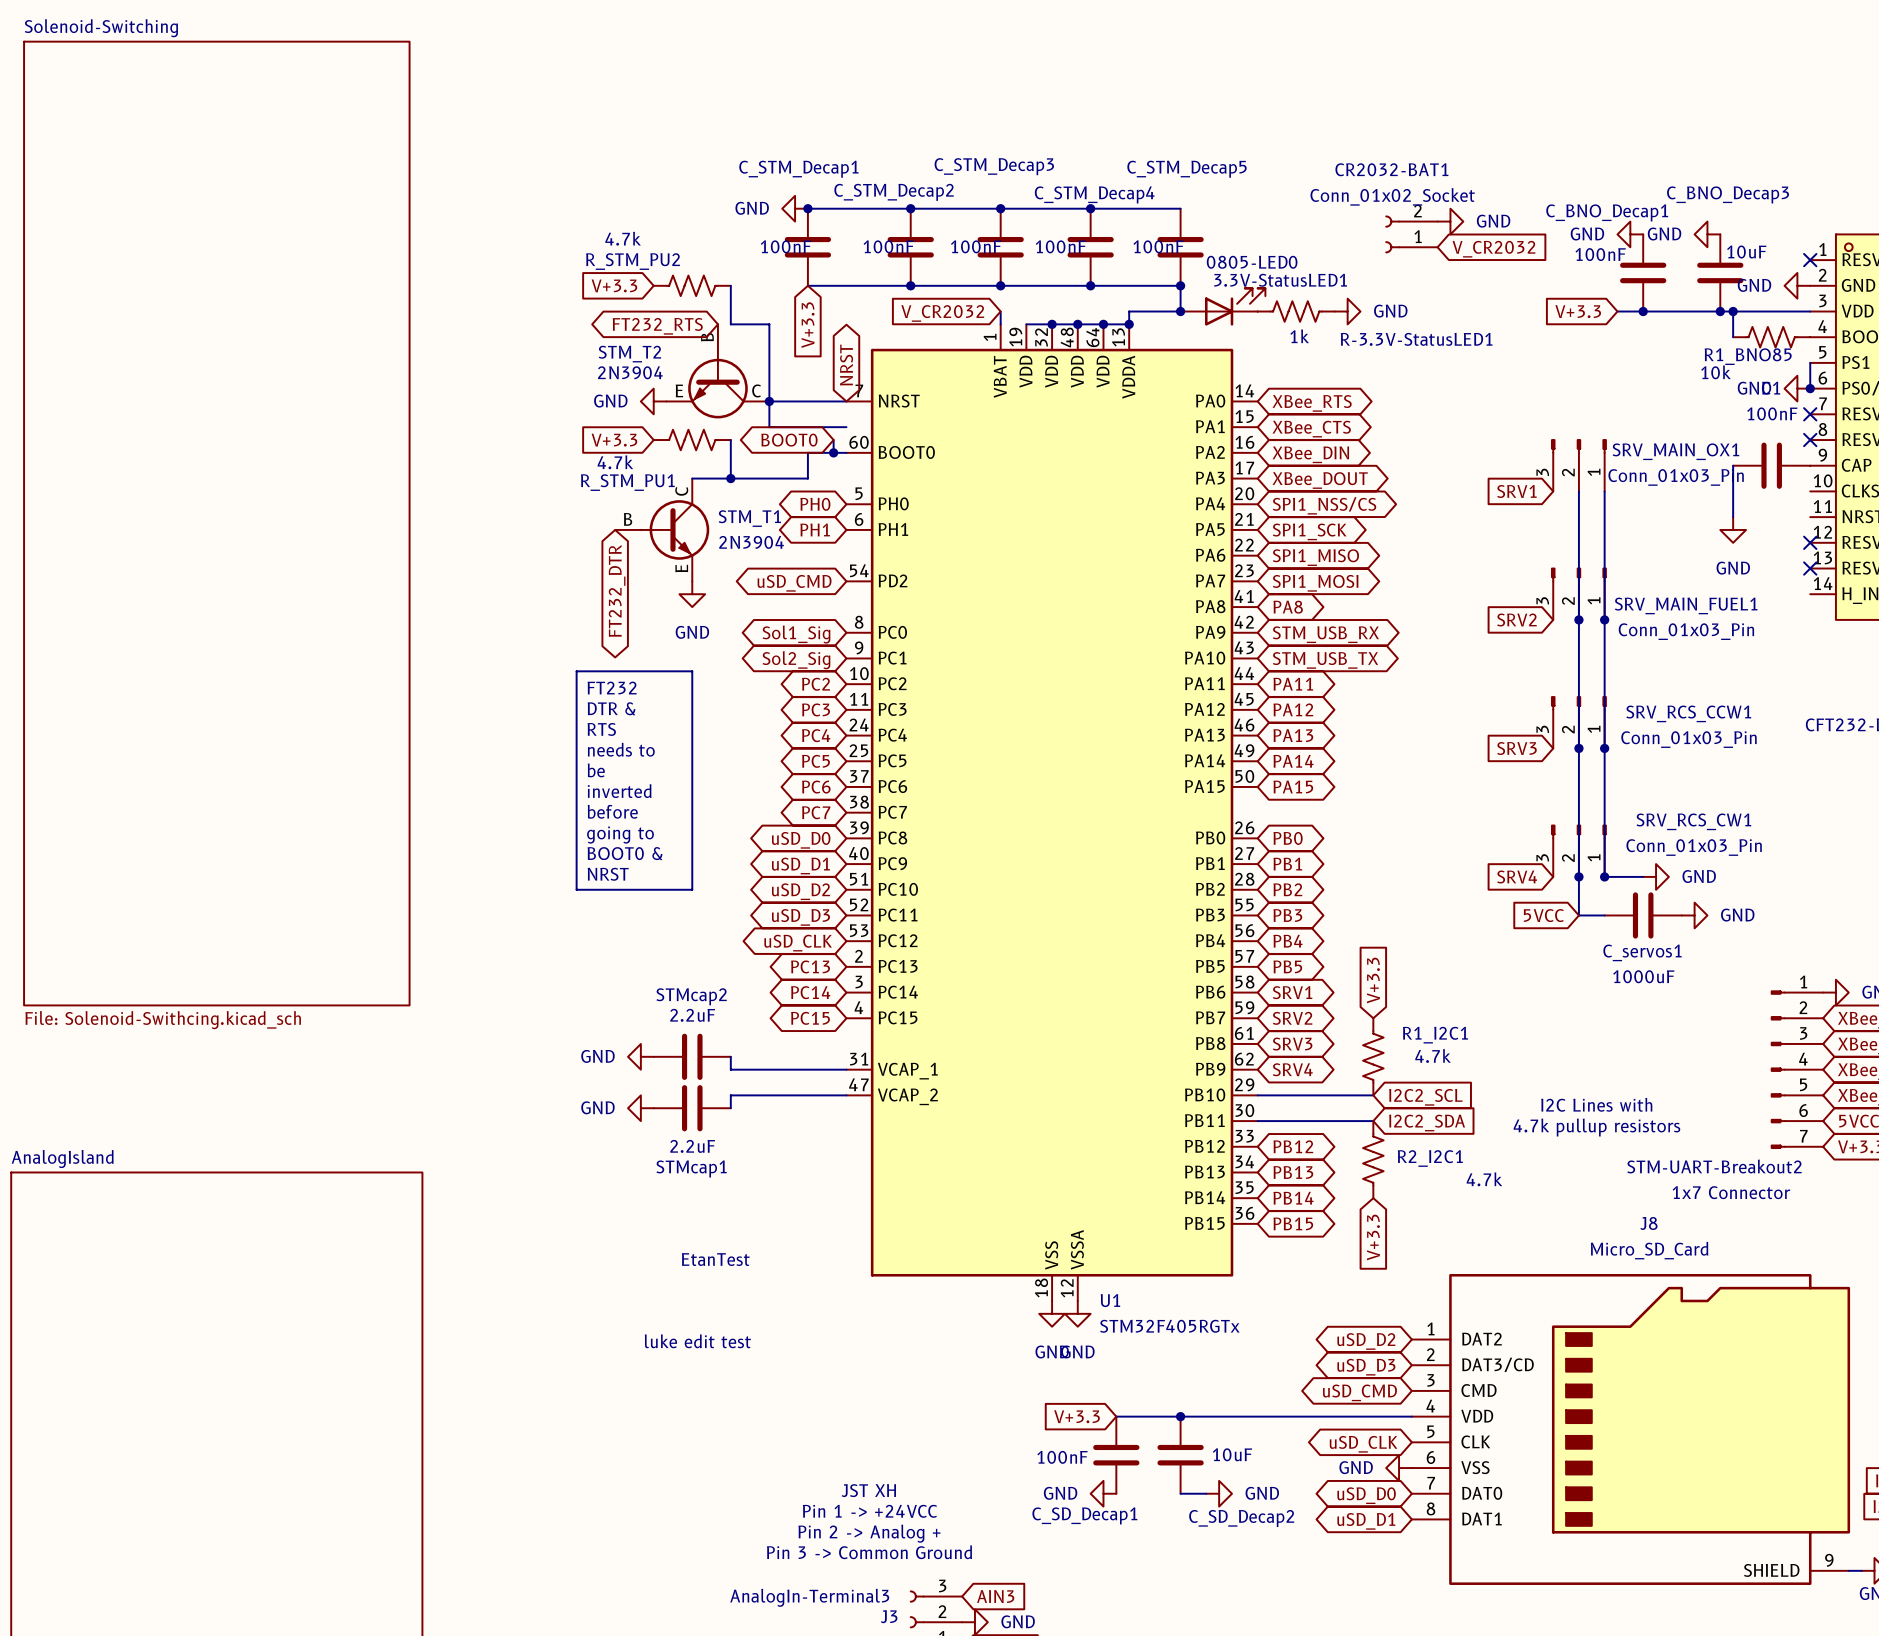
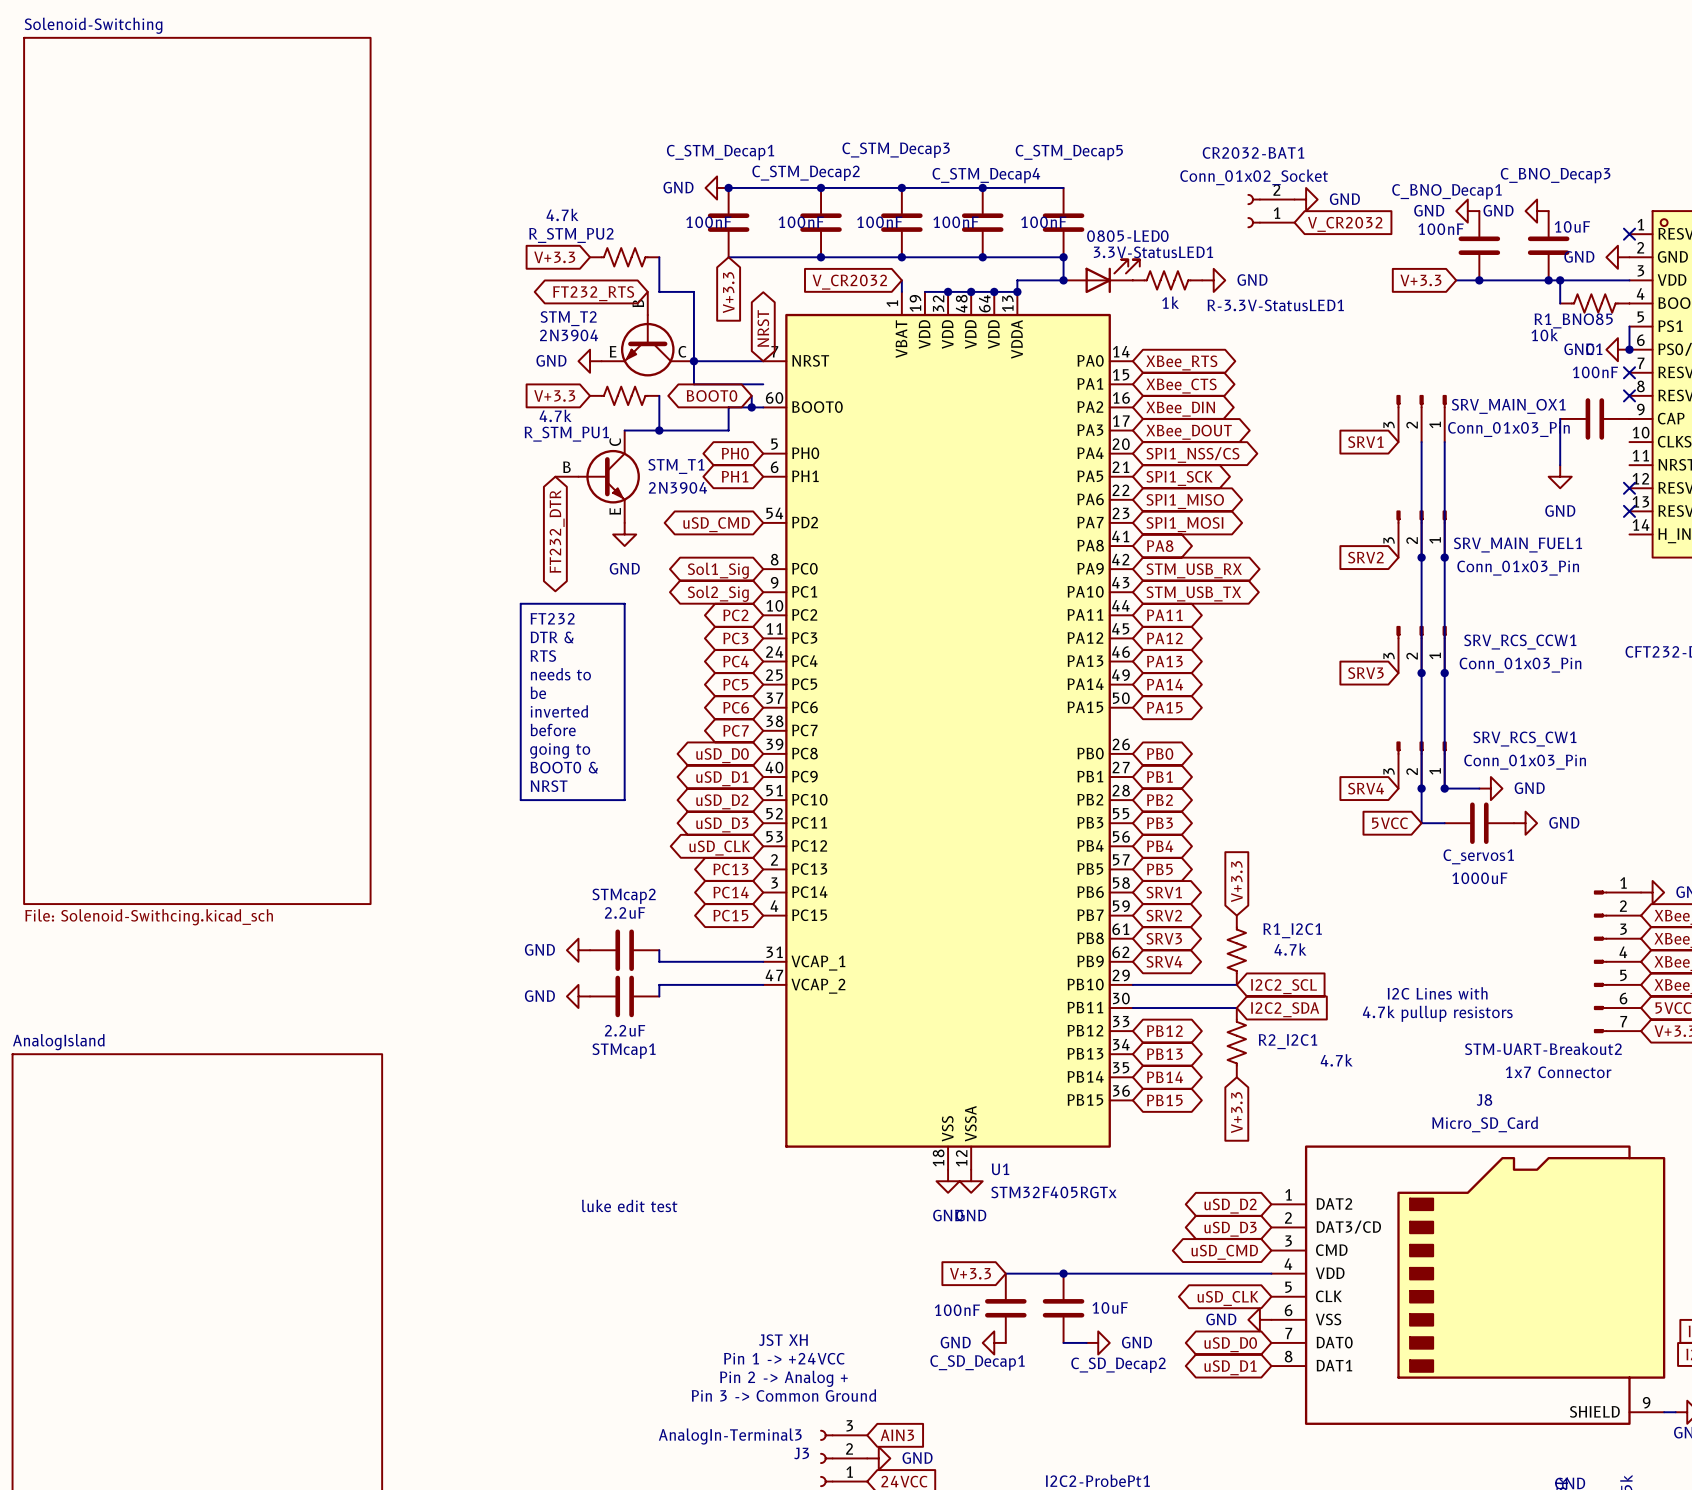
text: EtanTest (715, 1259) -> none

